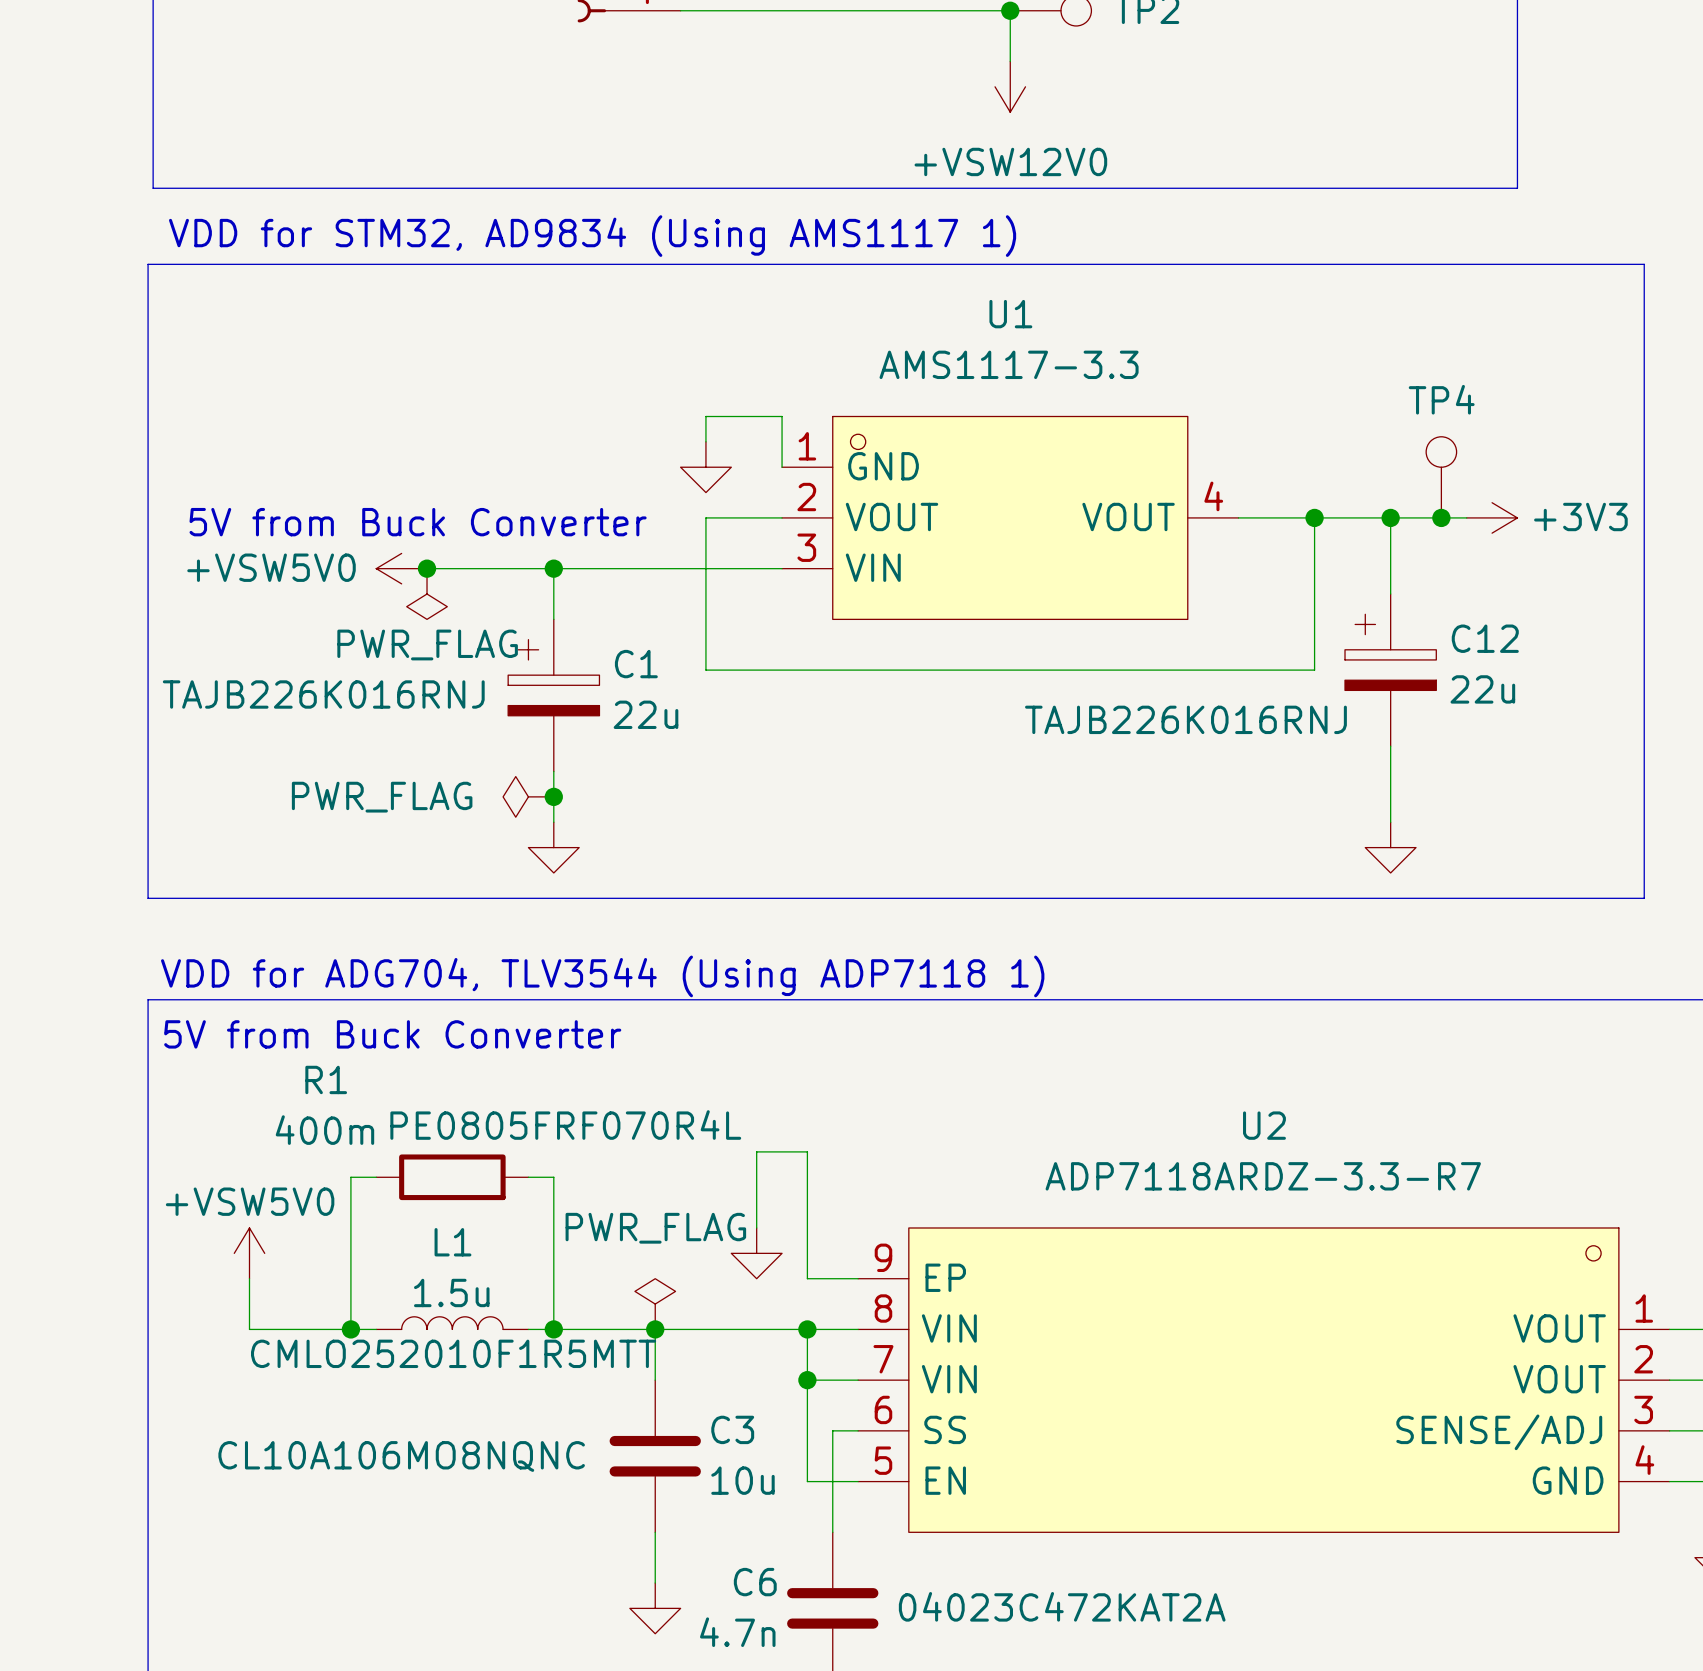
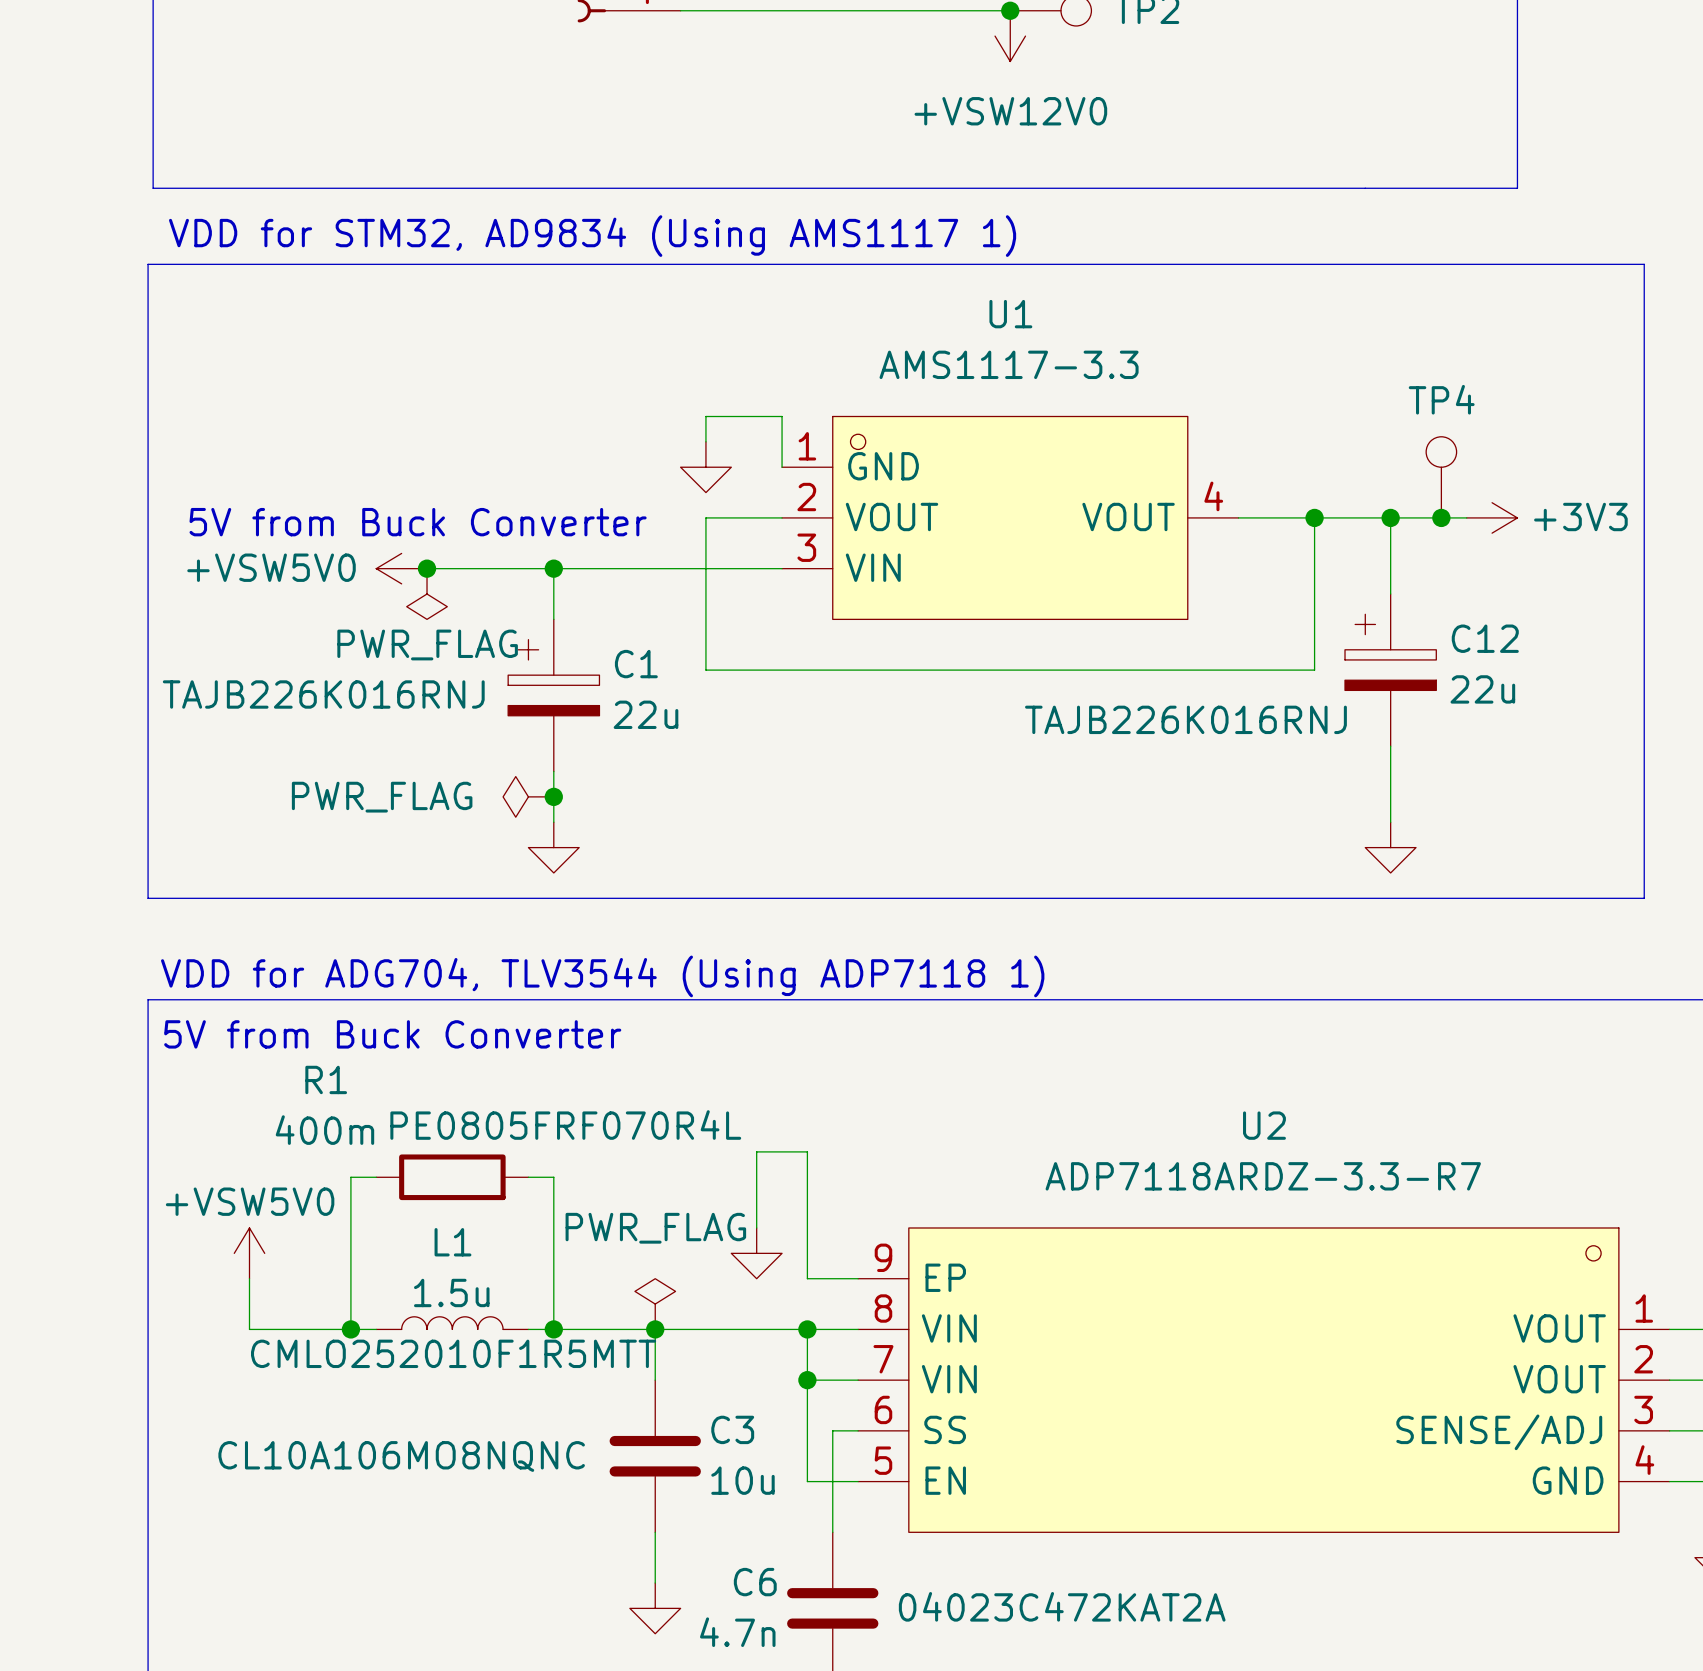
power symbol position: +VSW12V0 (1010, 86) -> +VSW12V0 (1010, 36)

